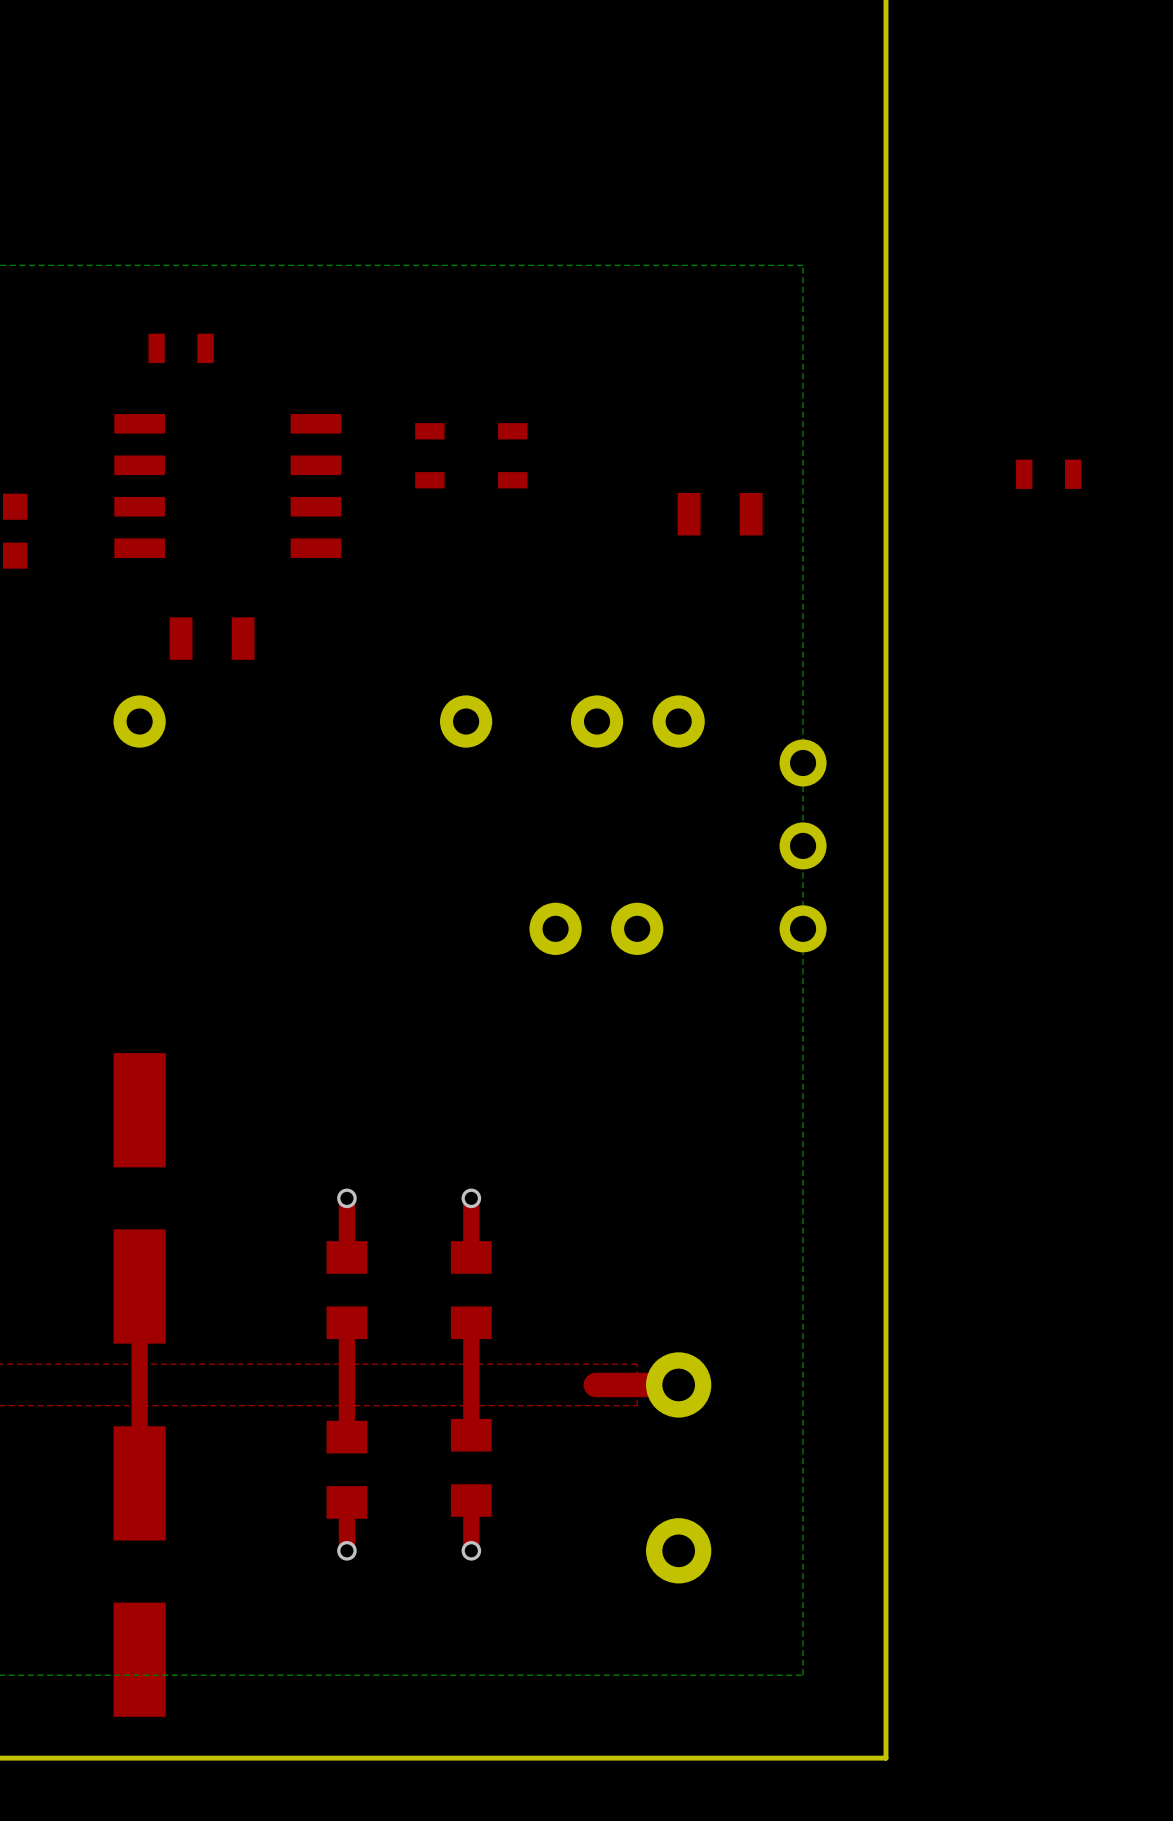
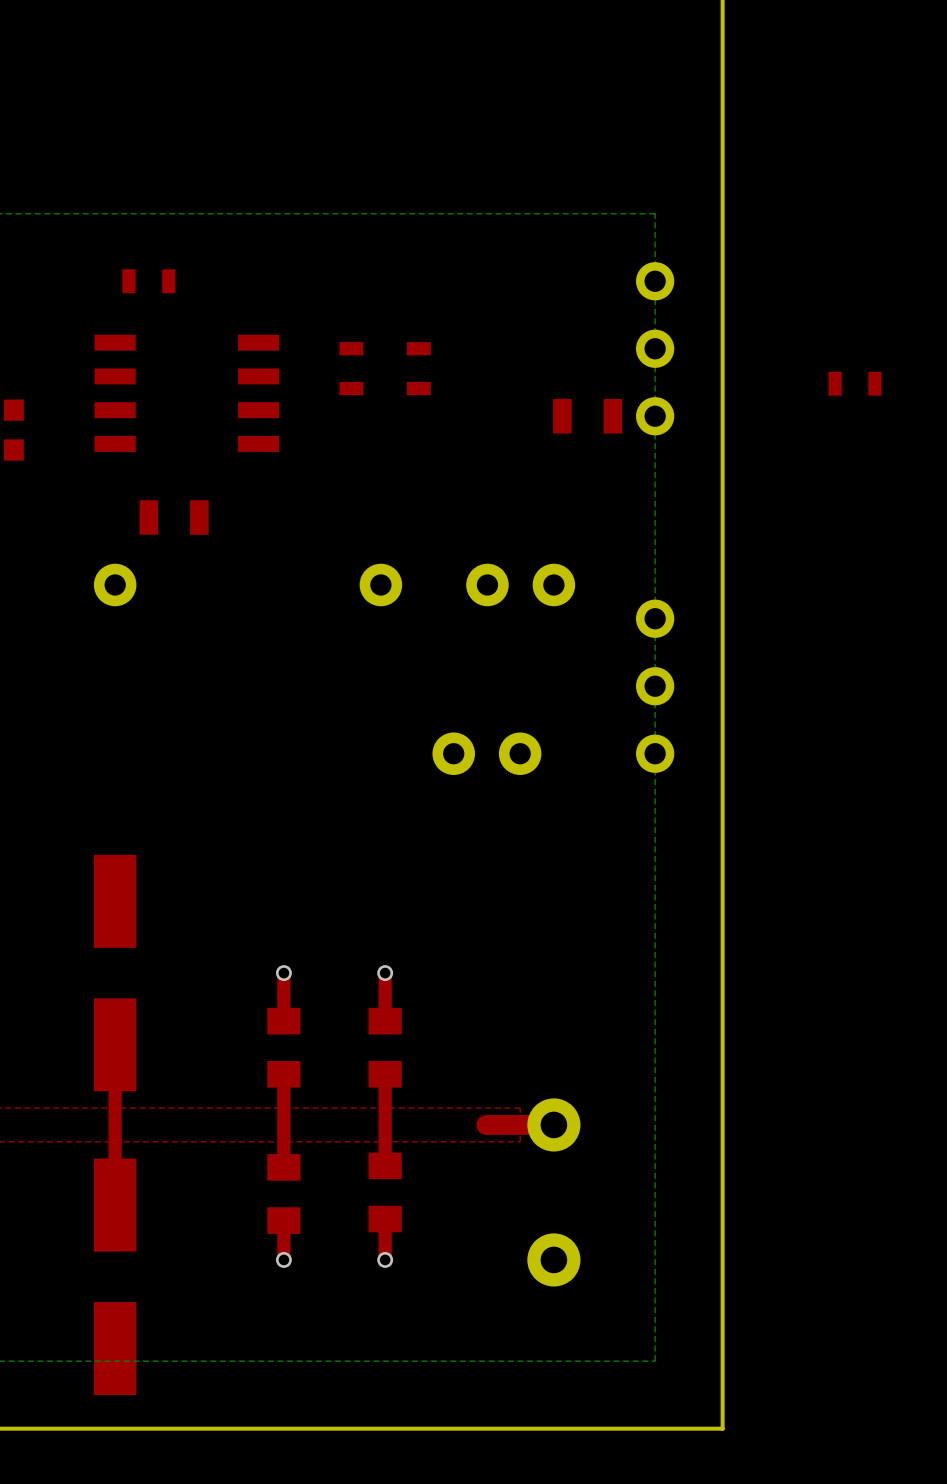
part: none -> (655, 348)

